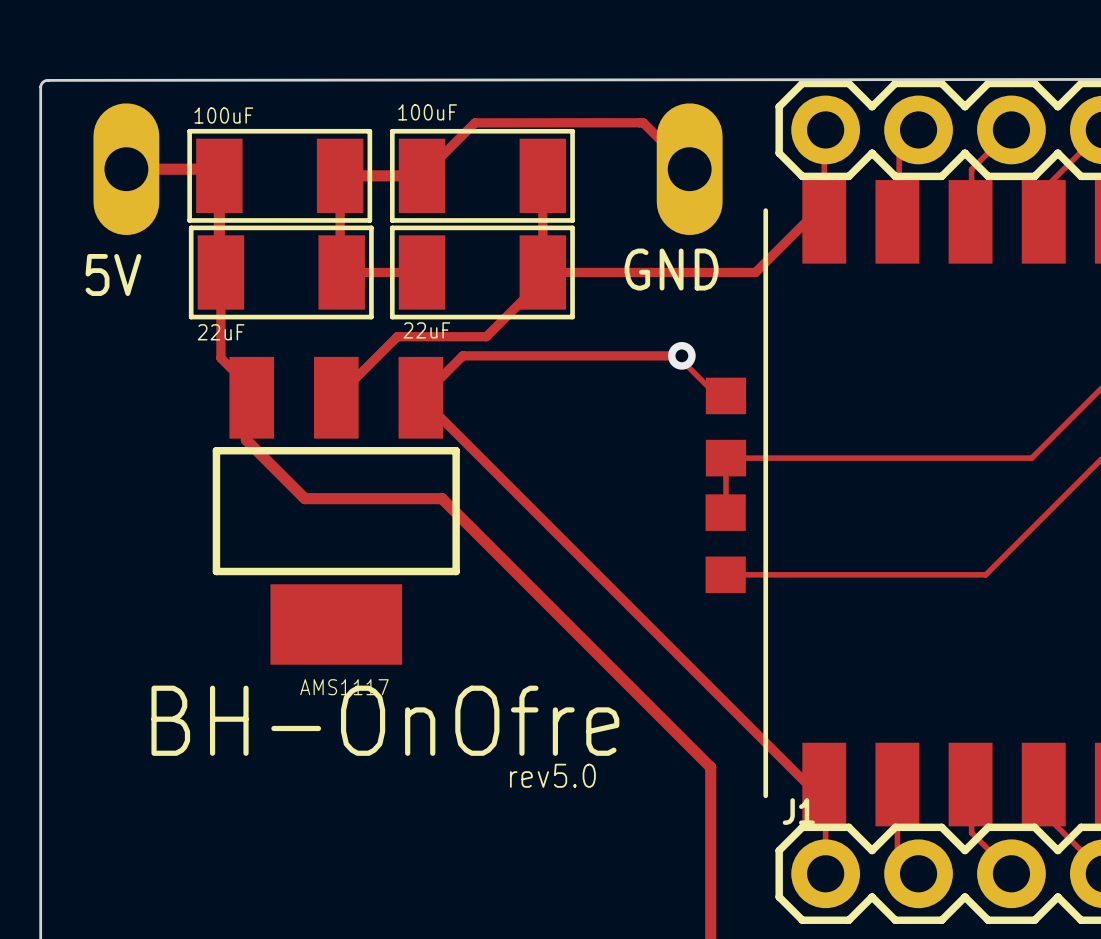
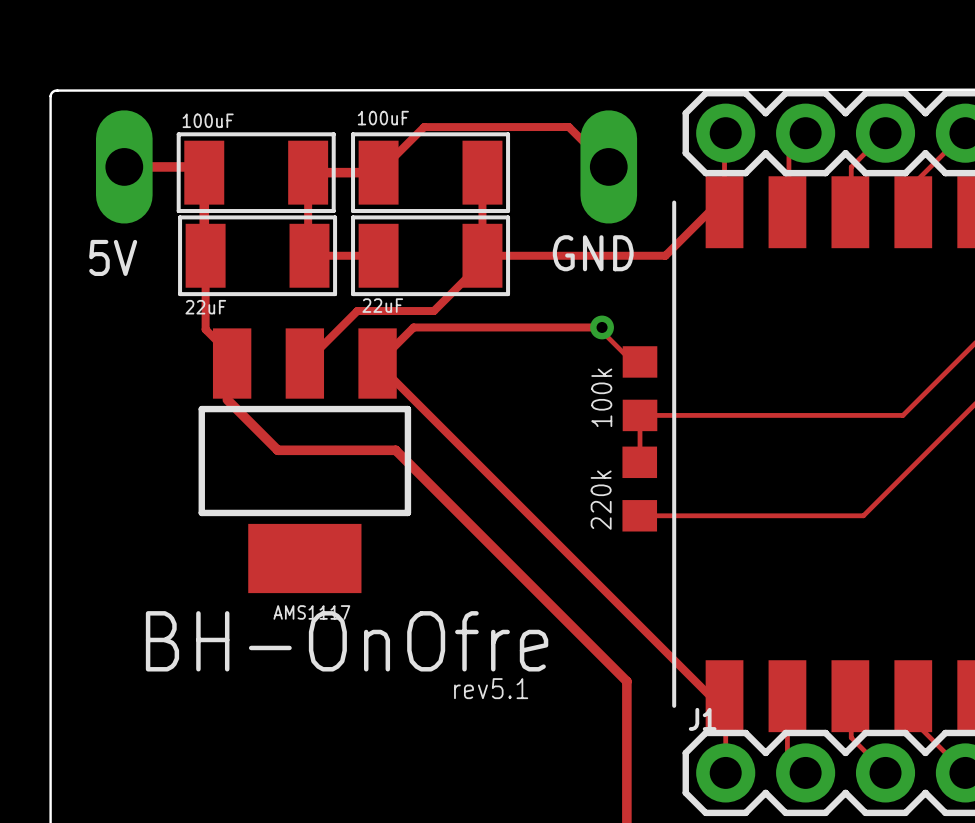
part value: none -> 100k (601, 397)
part value: none -> 220k (601, 500)
text: rev5.0 (552, 775) -> rev5.1 (491, 688)

